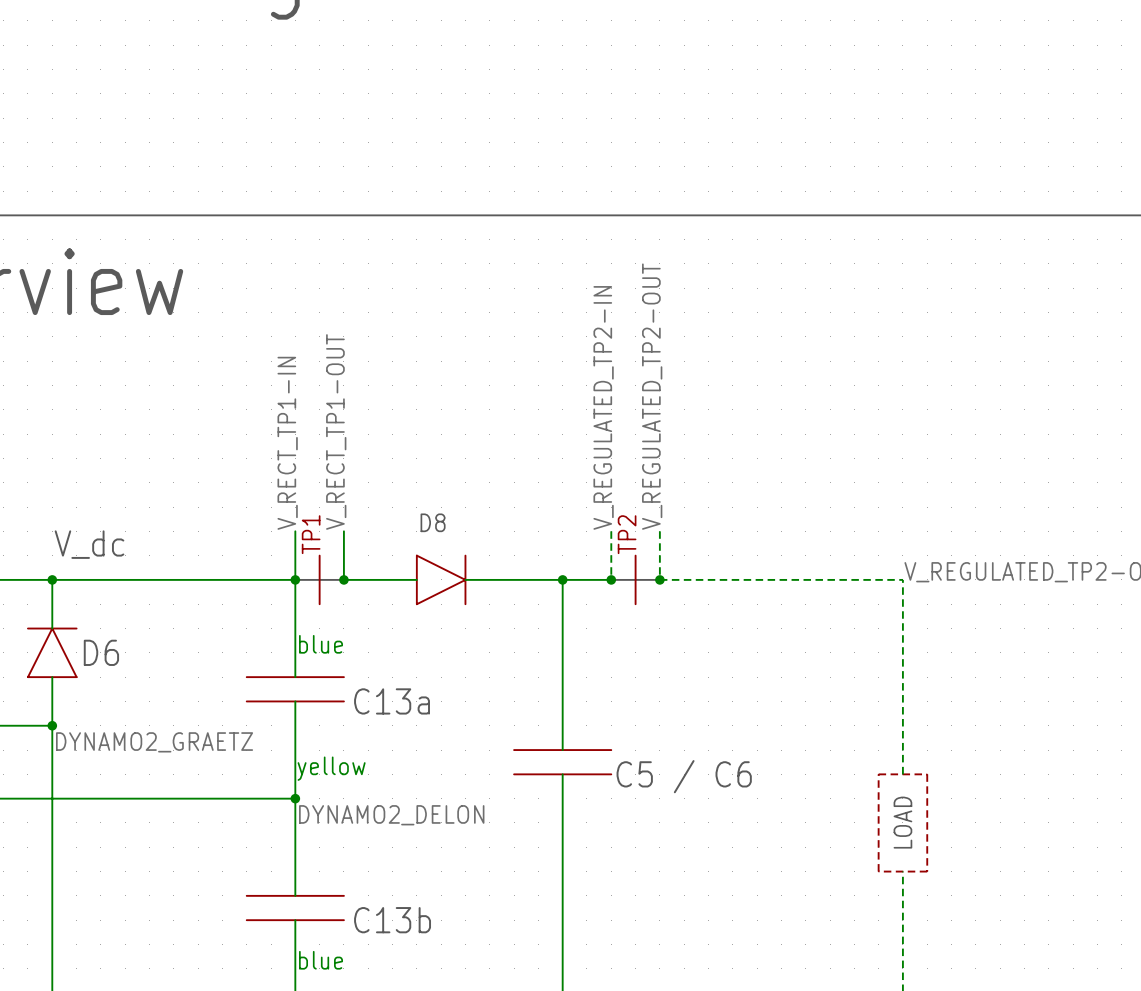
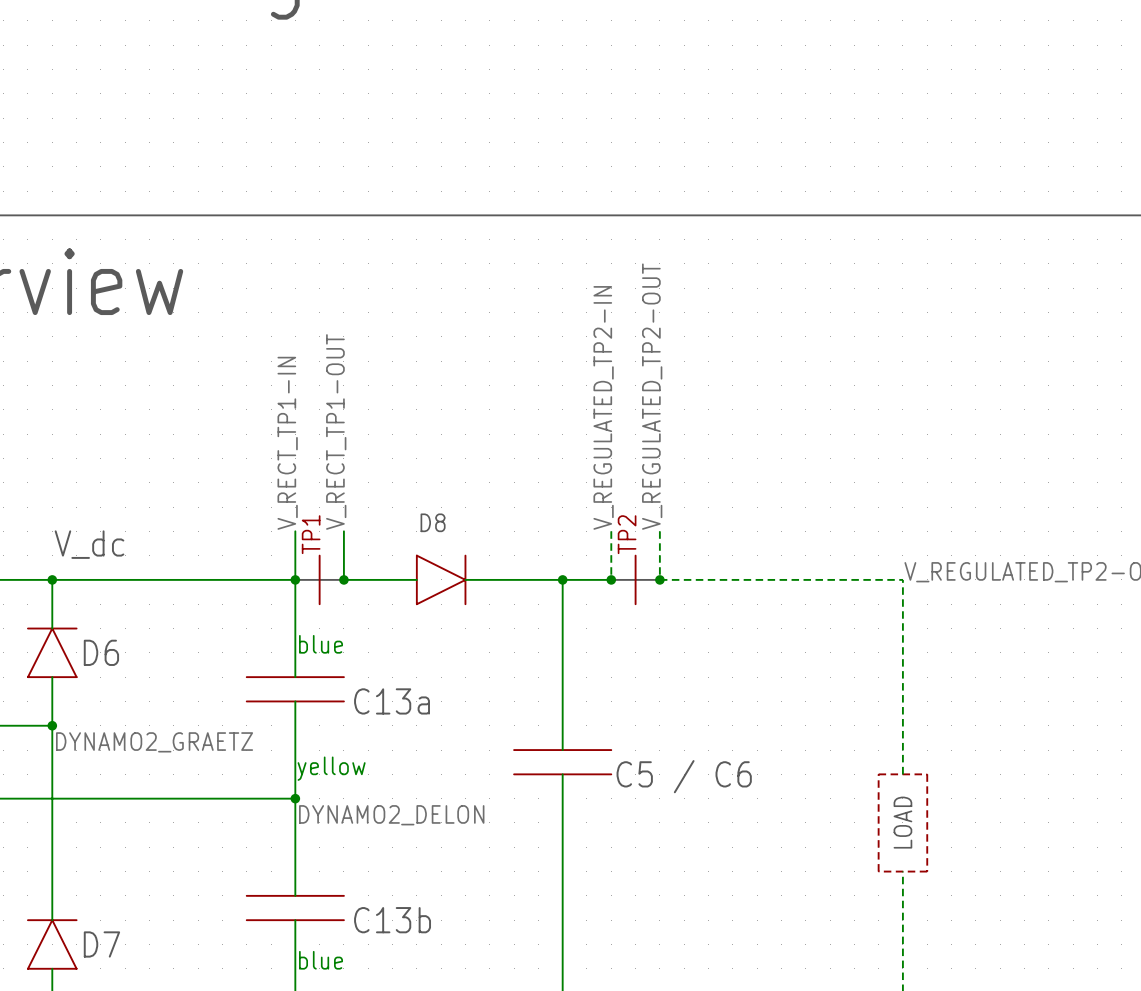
line: none -> (27, 920) (76, 920)
line: none -> (52, 920) (76, 968) (27, 968) (52, 920)
wire: (52, 920) (52, 968) -> none
text: none -> D7 (101, 944)

